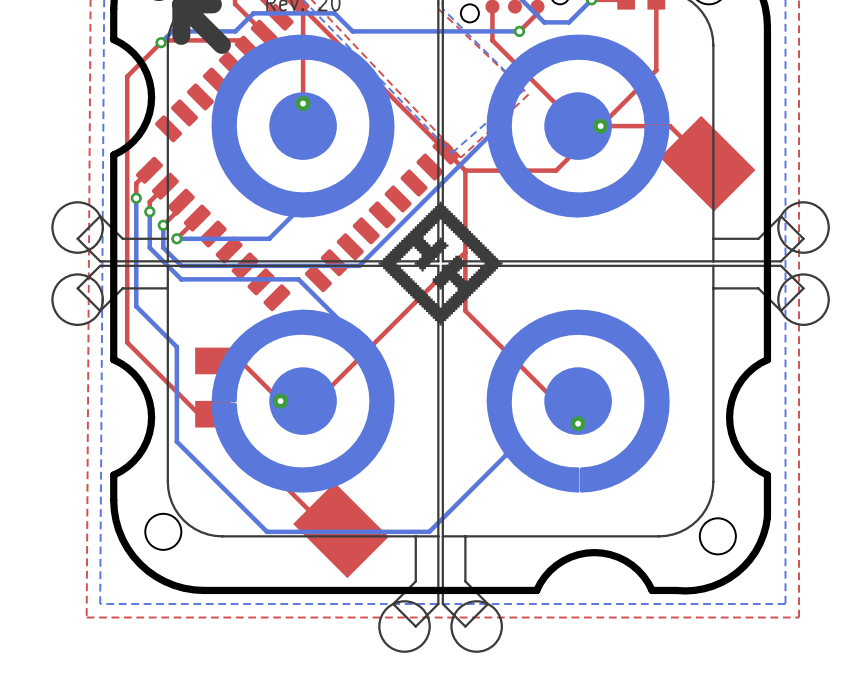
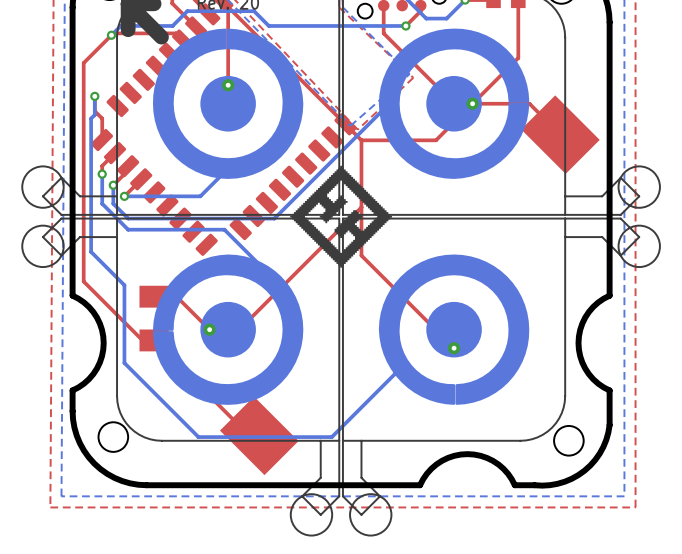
board edge: (113, 39) (127, 47) (143, 66) (149, 81) (151, 97) (149, 113) (143, 128) (127, 146) (113, 154) -> (72, 32) (72, 127)
bottom track: none -> (94, 96) (94, 114) (91, 118) (91, 163)
top track: none -> (94, 96) (94, 111) (102, 118) (102, 140)
top track: (149, 170) (136, 183) (136, 198) -> none
via position: (136, 198) -> (94, 96)

